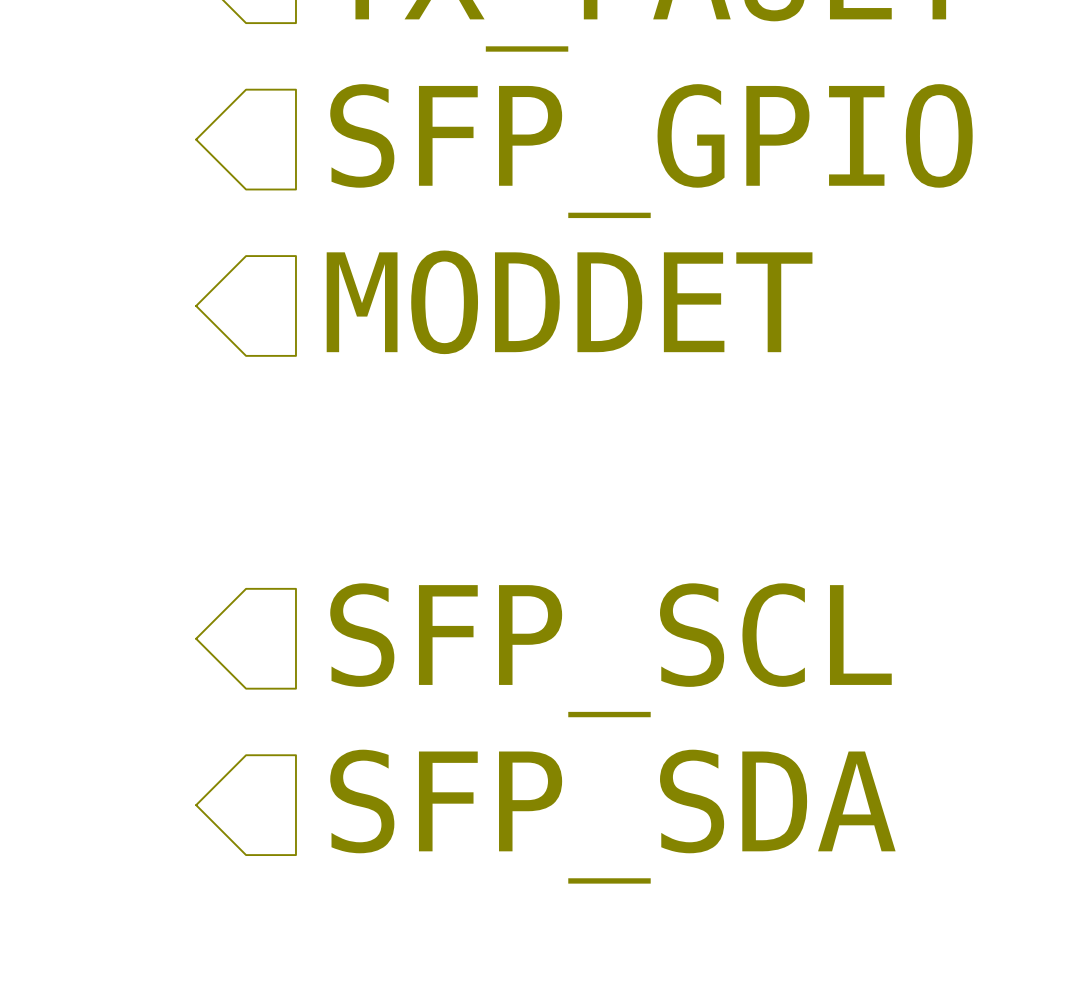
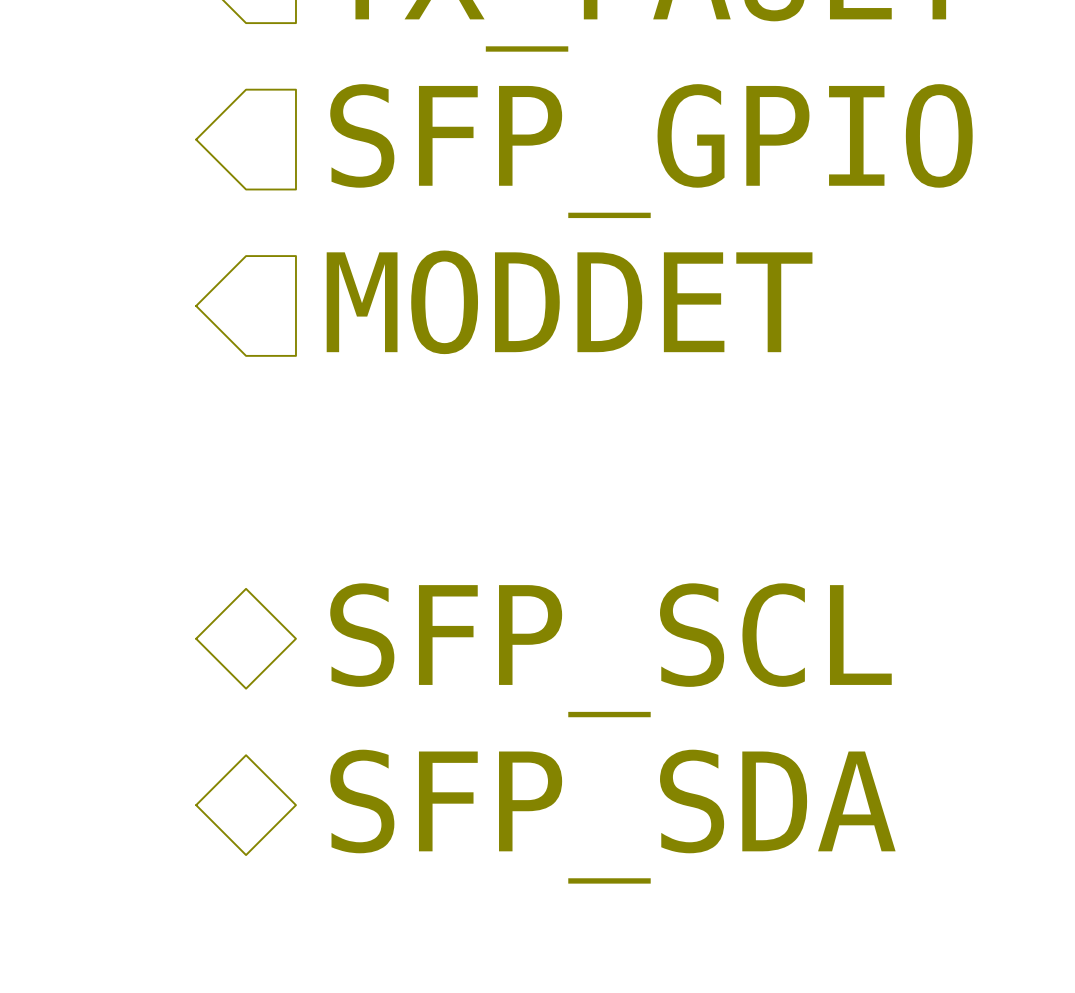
hierarchical label shape: input (610, 650) -> bidirectional (610, 650)
hierarchical label shape: input (612, 816) -> bidirectional (612, 816)

